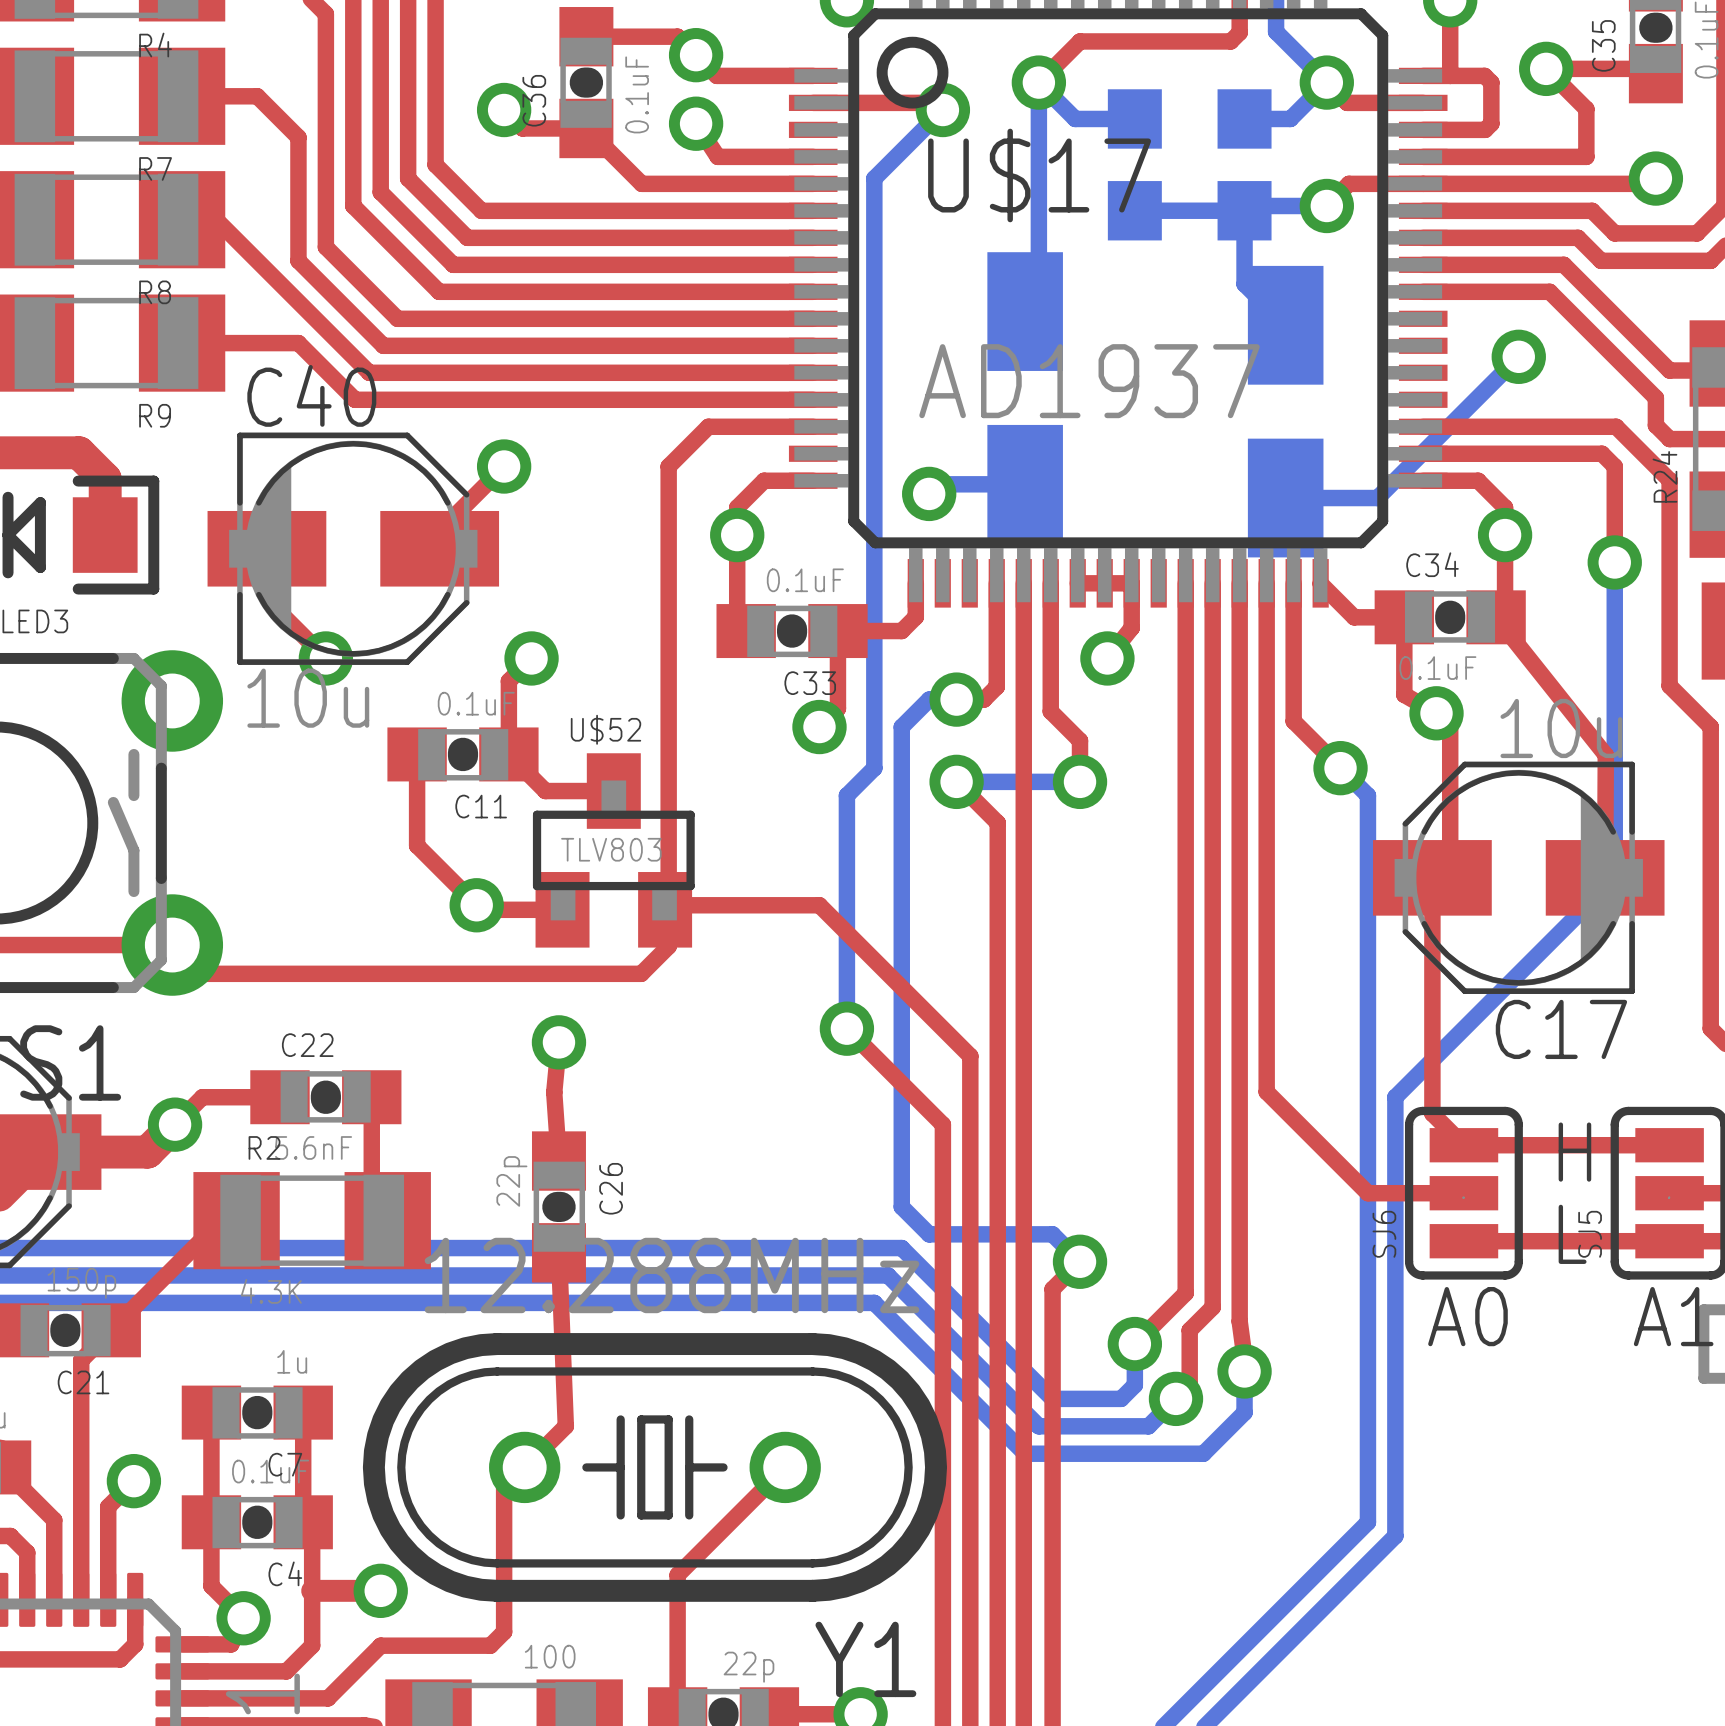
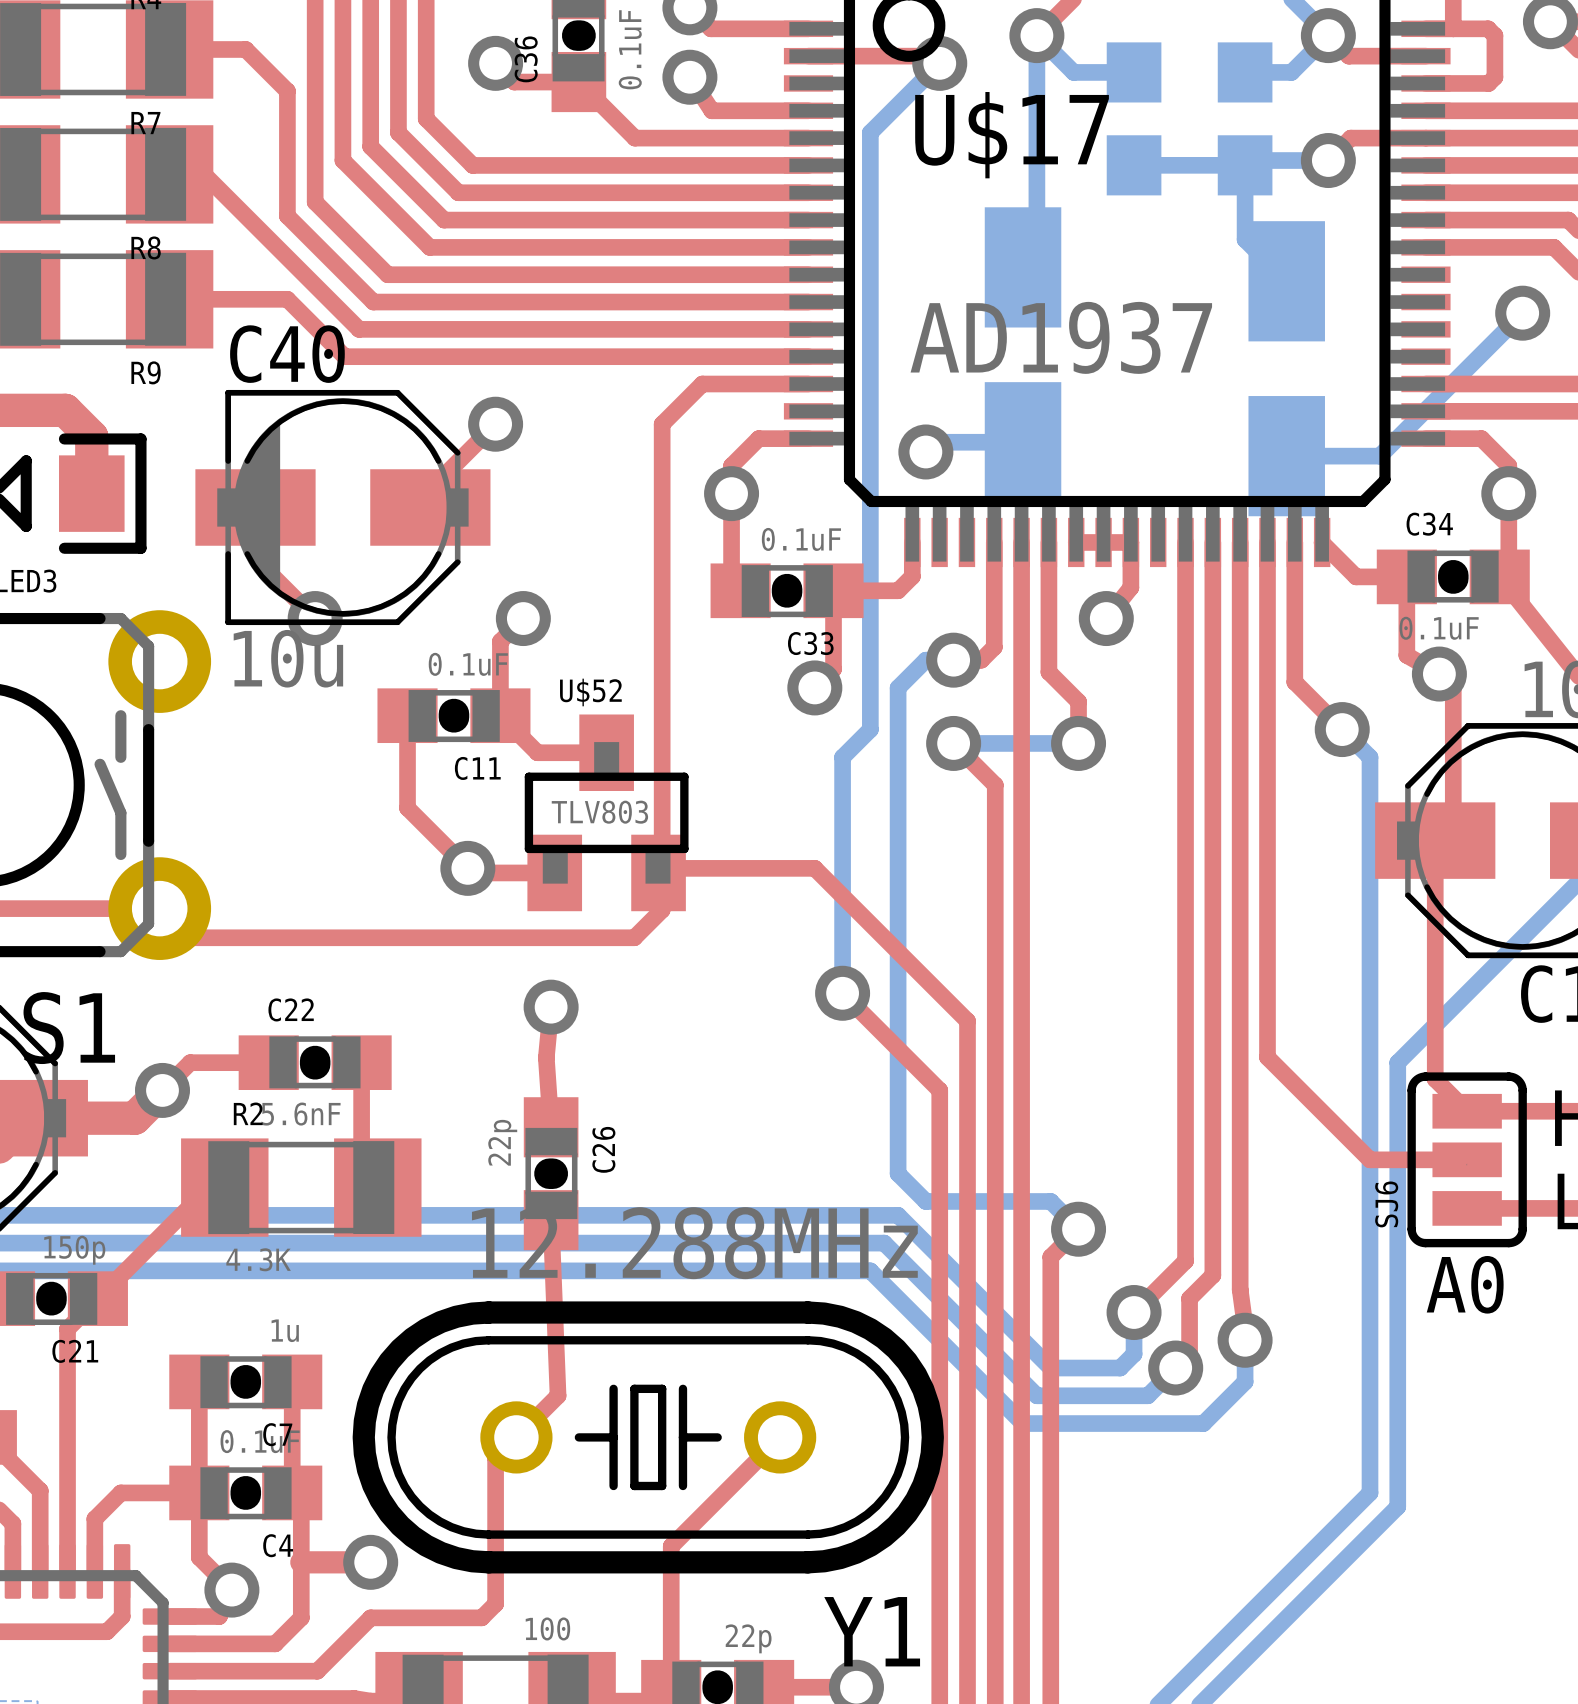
top track: (133, 1481) (108, 1506) (108, 1547) -> (199, 1492) (120, 1492) (94, 1518)
via: (133, 1481) -> none

